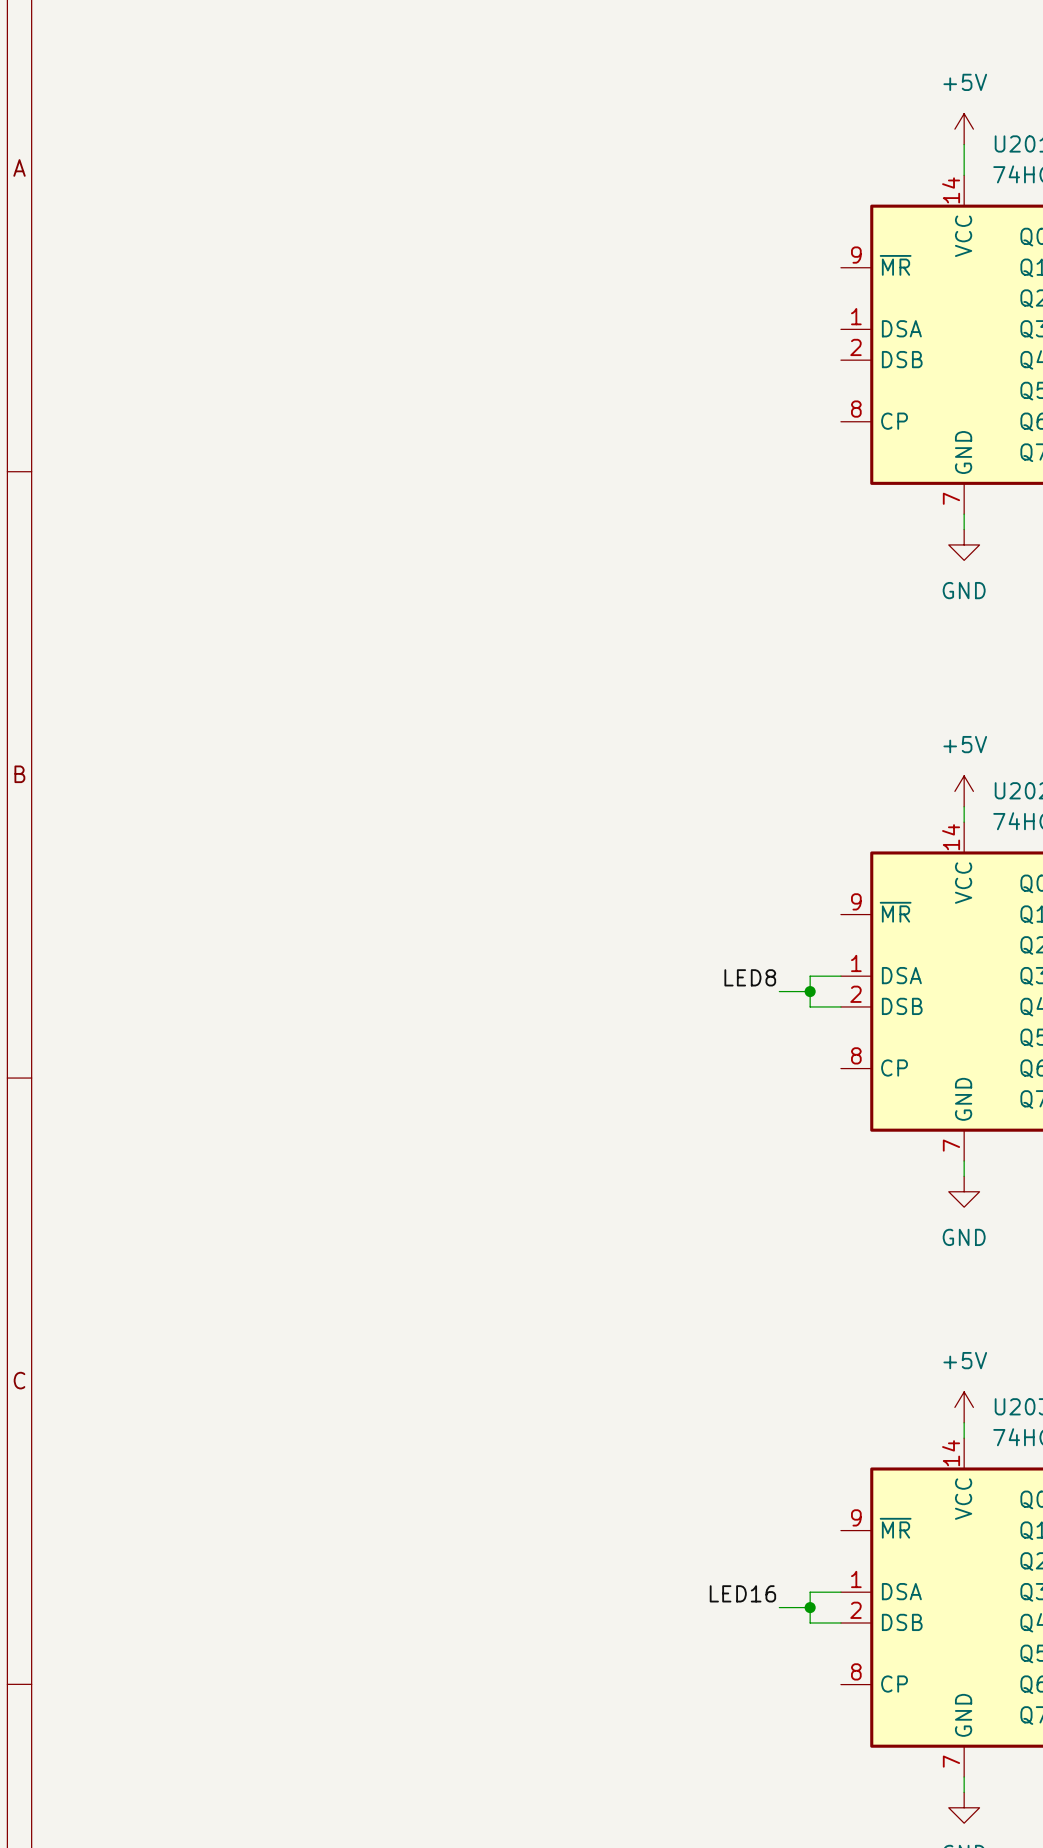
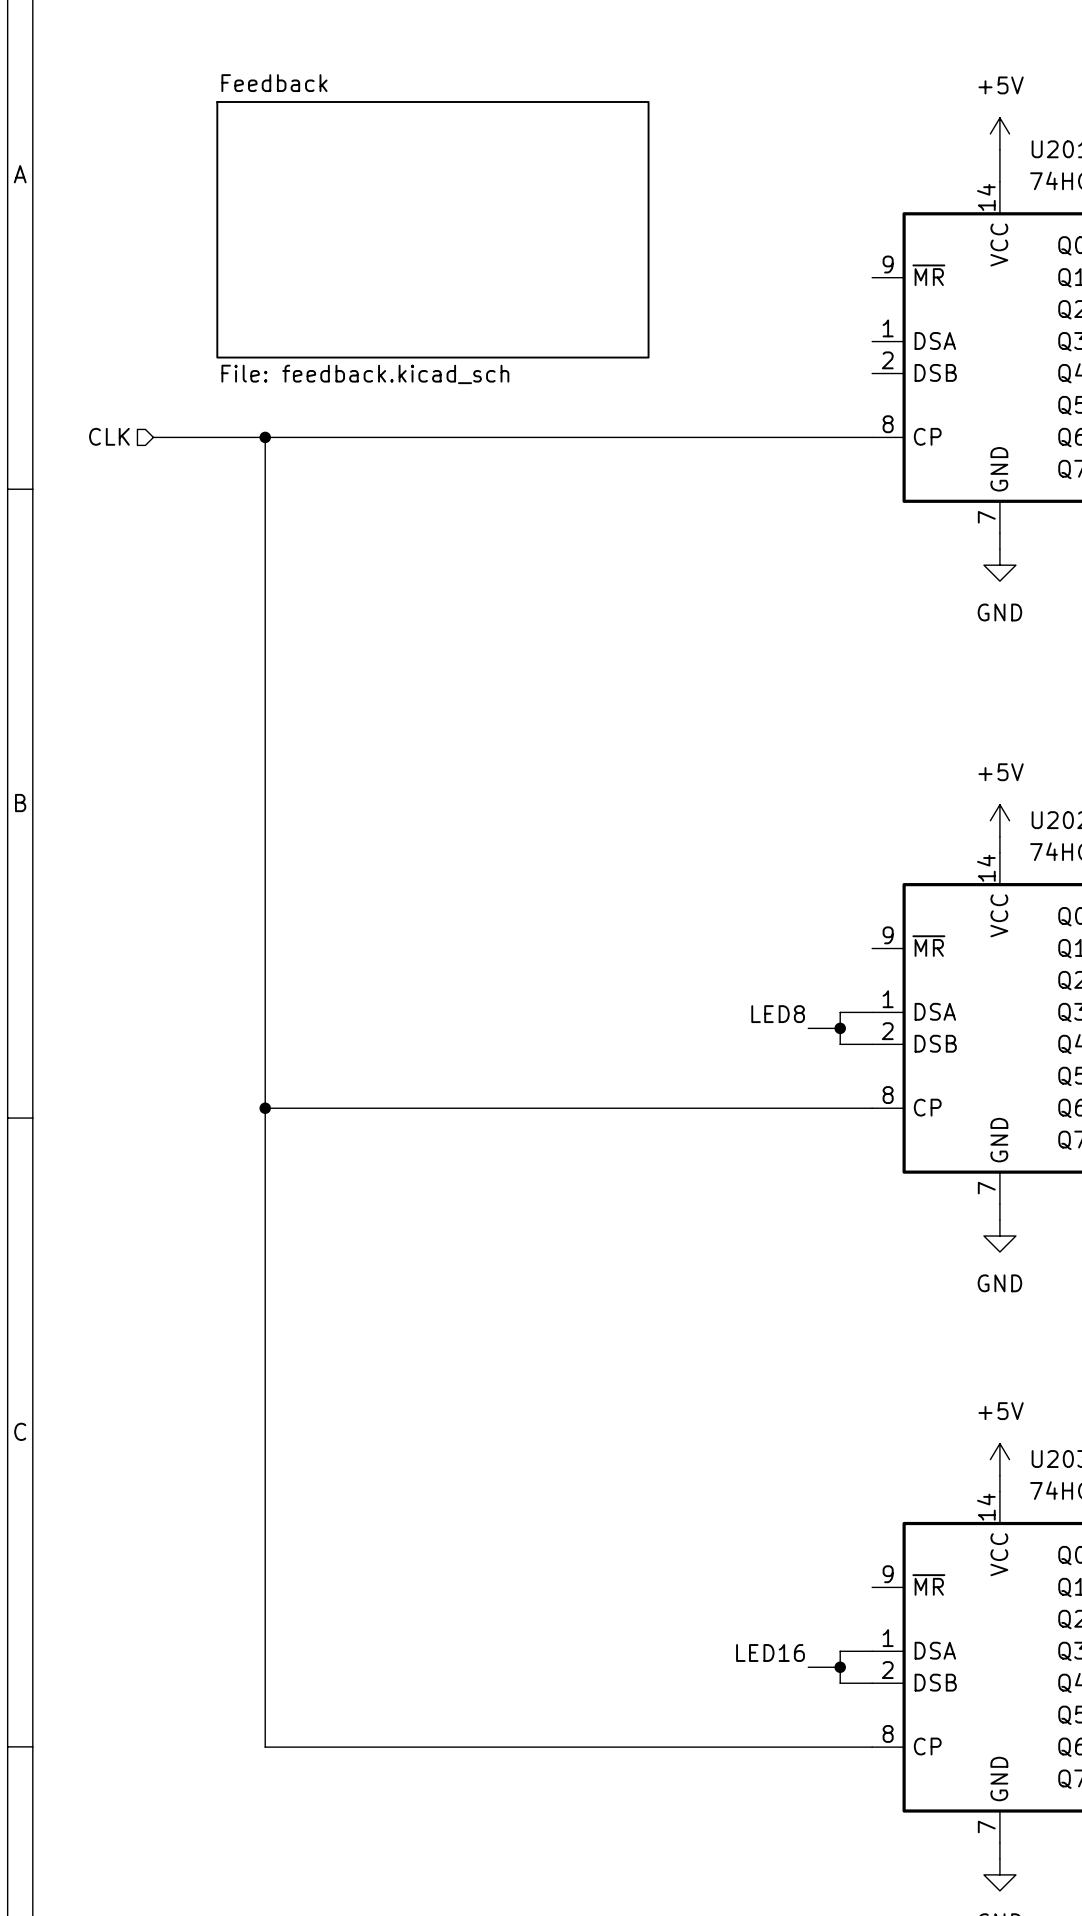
sheet Feedback: none -> File: feedback.kicad_sch (432, 229)
hierarchical label: none -> CLK (109, 436)
wire: none -> (153, 437) (872, 437)
wire: none -> (265, 437) (265, 1747) (872, 1747)
junction: none -> (265, 437)
wire: none -> (265, 1108) (872, 1108)
junction: none -> (265, 1108)

